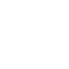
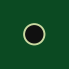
part: none -> (34, 34)

